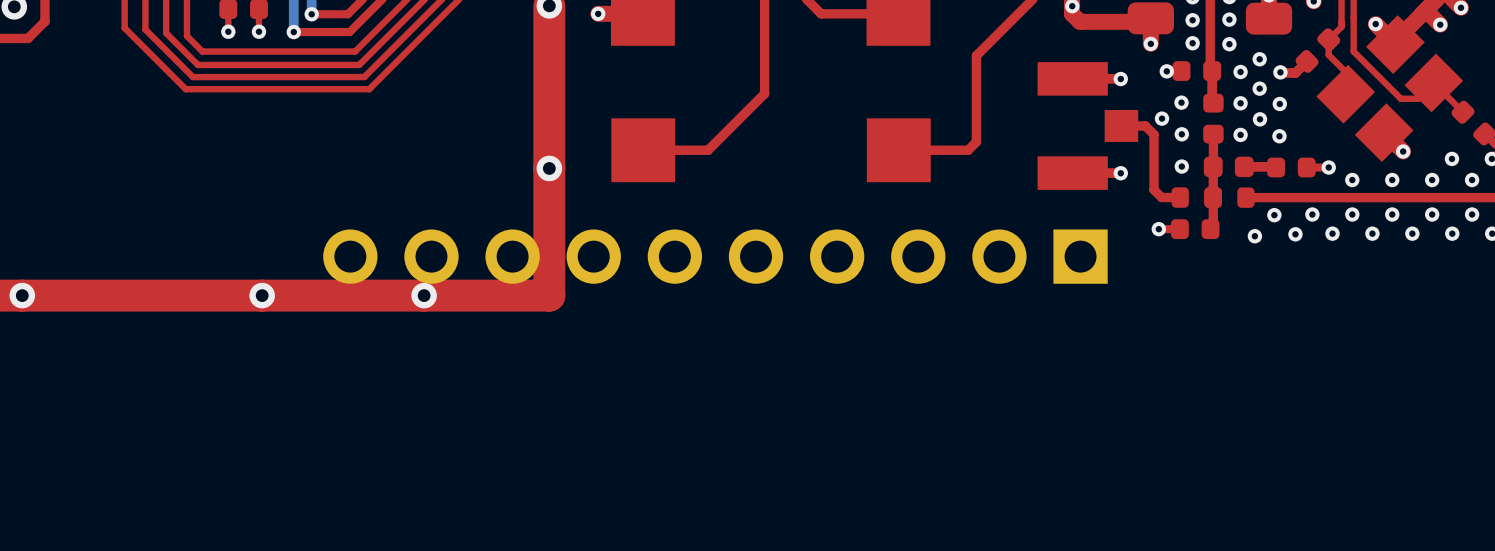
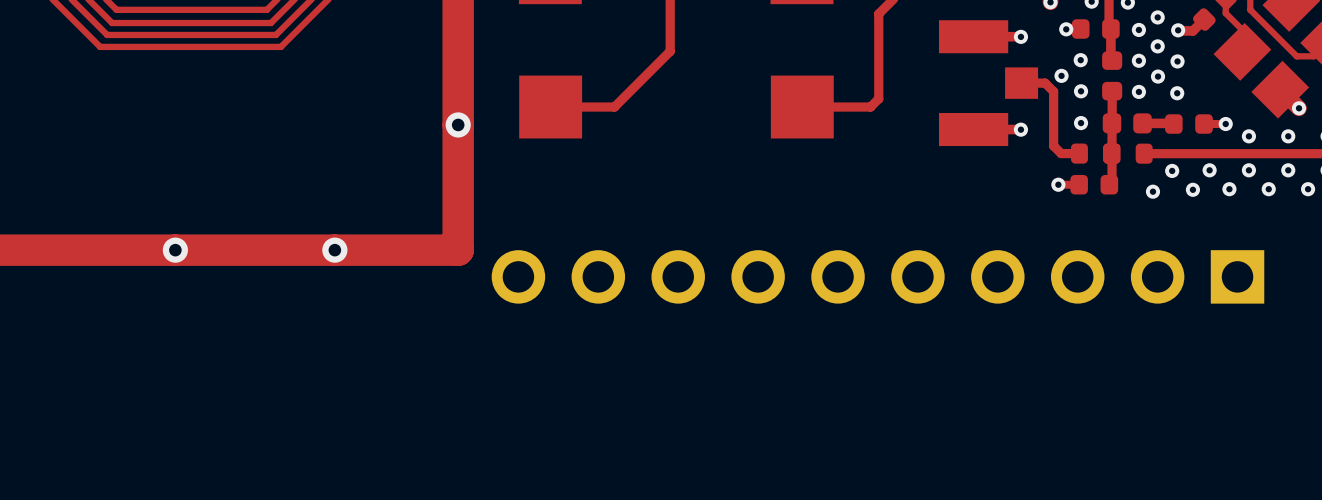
part position: (715, 256) -> (877, 276)

